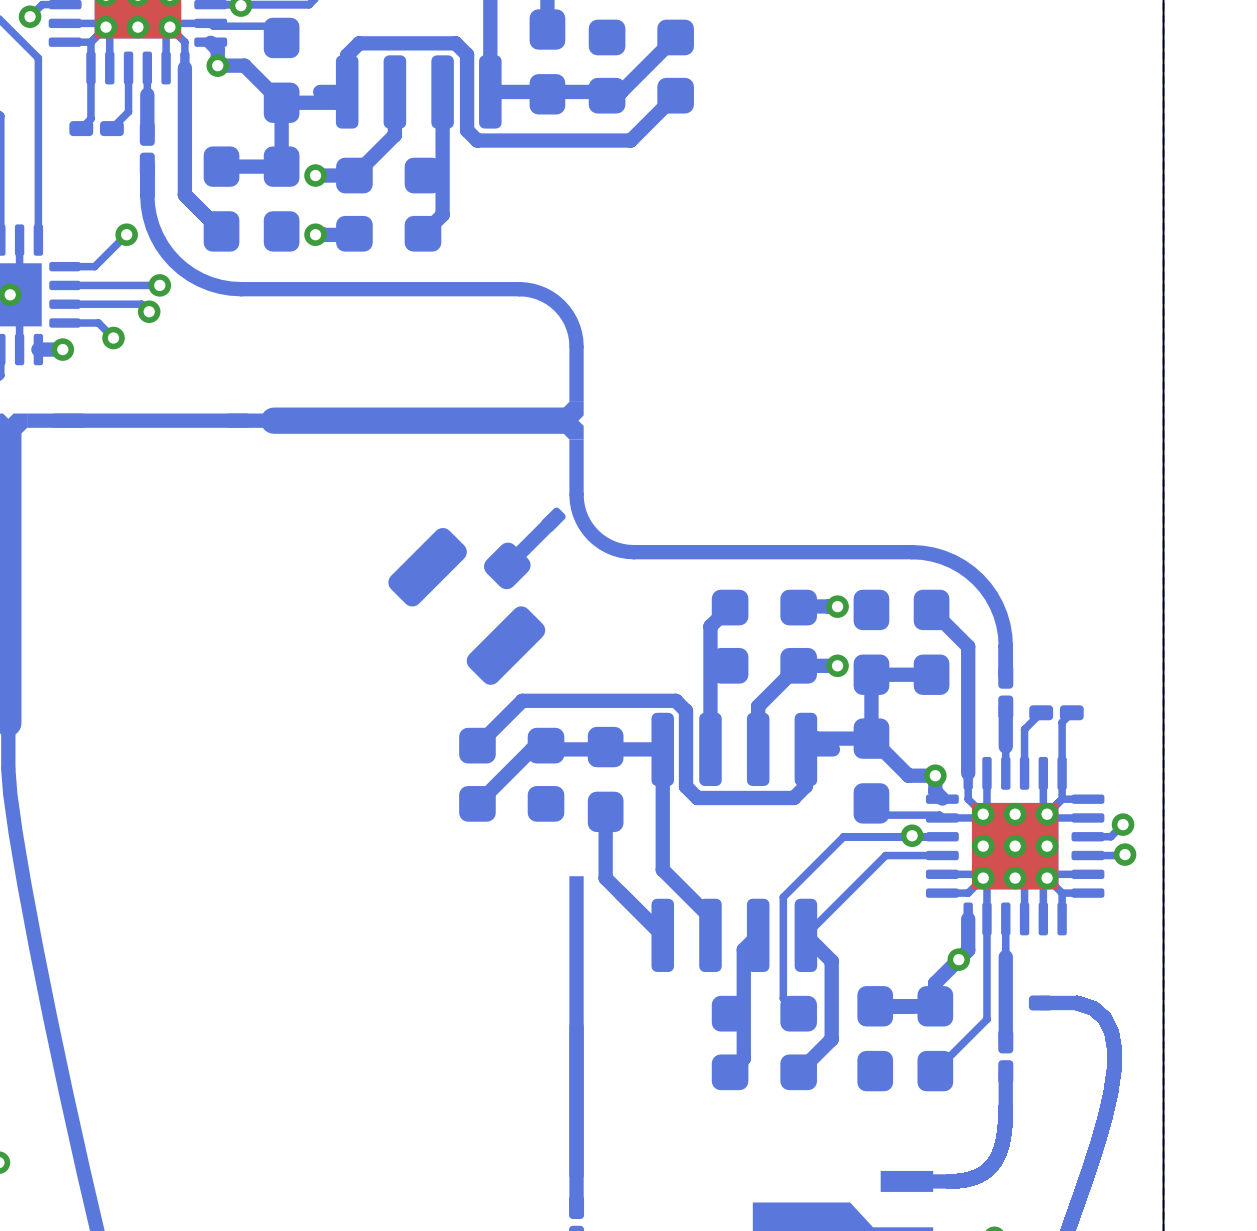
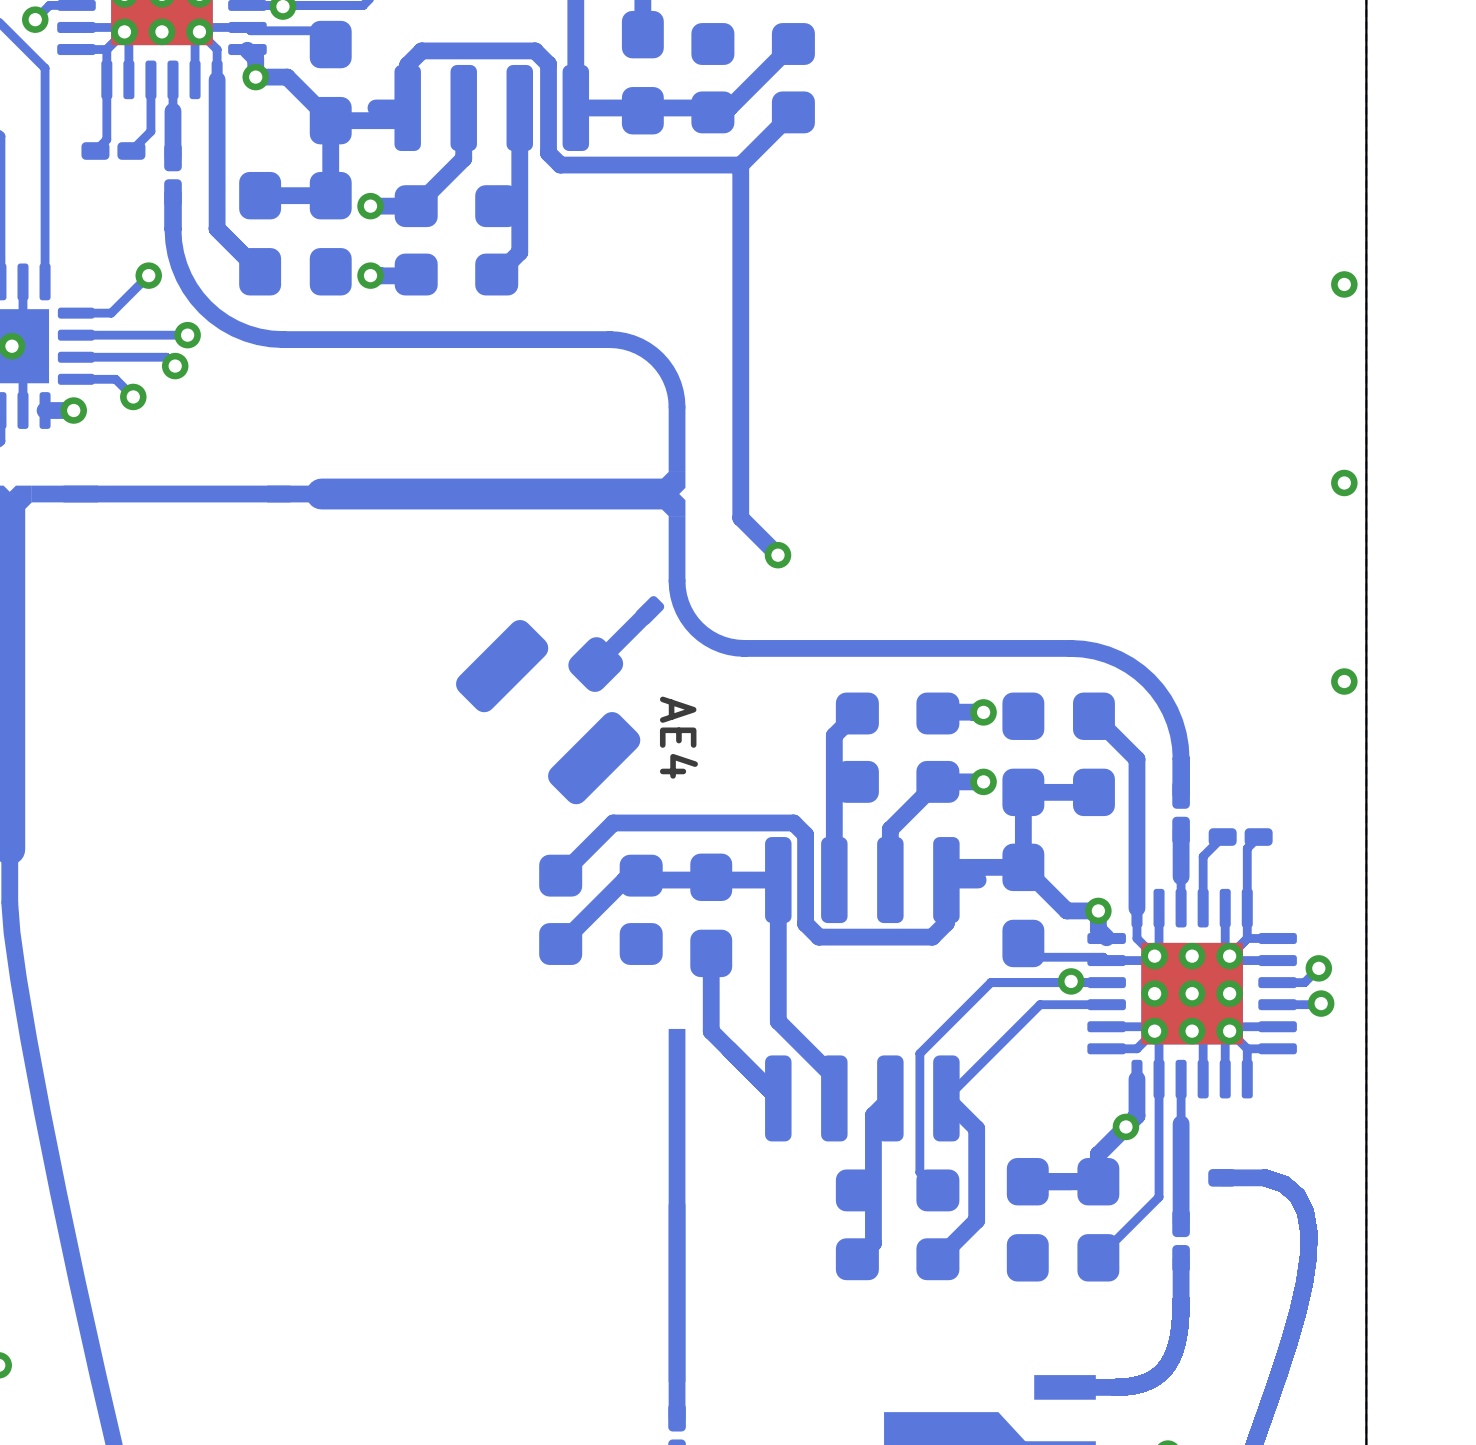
bottom track: none -> (740, 165) (740, 517) (778, 555)
via: none -> (1344, 284)
via: none -> (1344, 482)
via: none -> (778, 555)
via: none -> (1344, 681)
AE4 name: none -> AE4 (678, 737)

